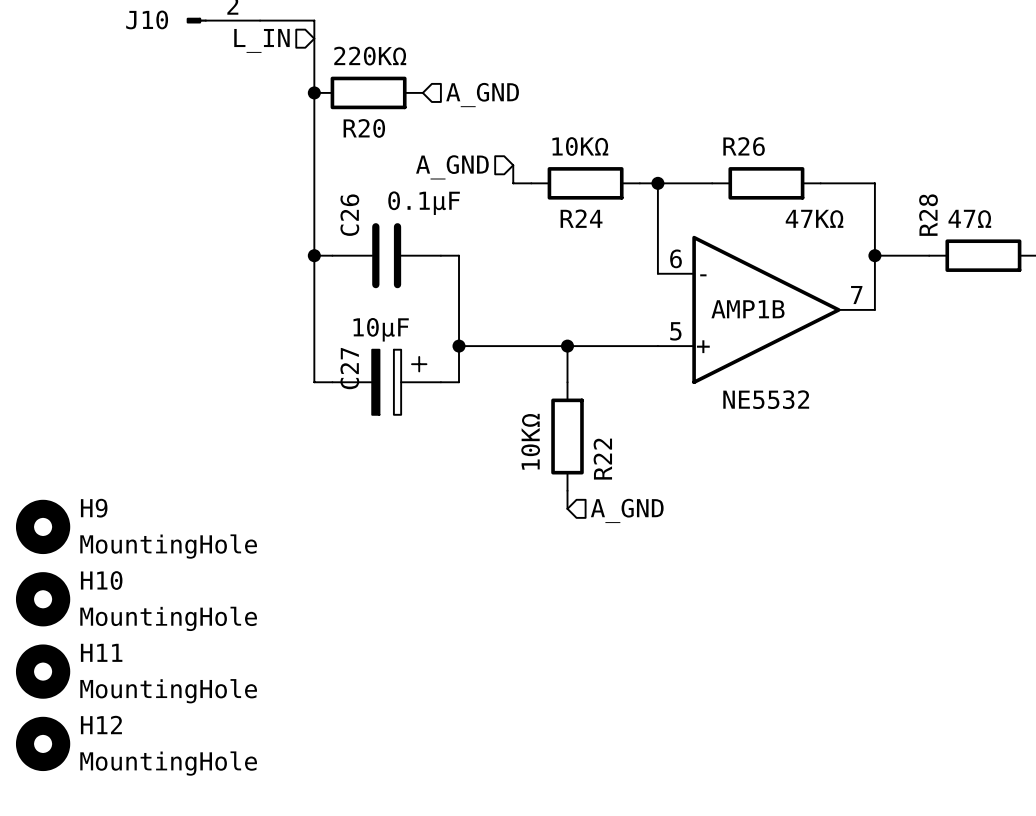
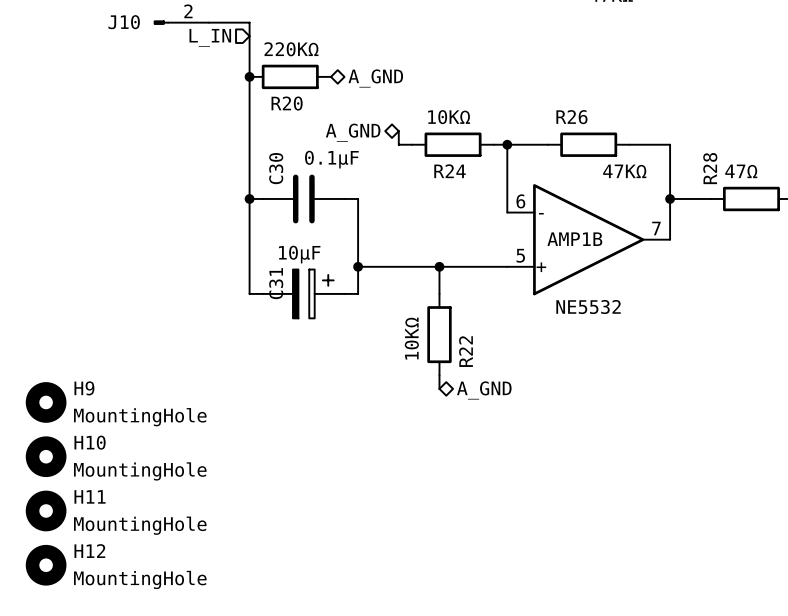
hierarchical label shape: input (482, 95) -> bidirectional (375, 78)
hierarchical label shape: input (452, 167) -> bidirectional (353, 132)
C26 name: C26 (349, 215) -> C30 (276, 168)
C27 name: C27 (349, 368) -> C31 (276, 283)
hierarchical label shape: input (627, 510) -> bidirectional (484, 390)

